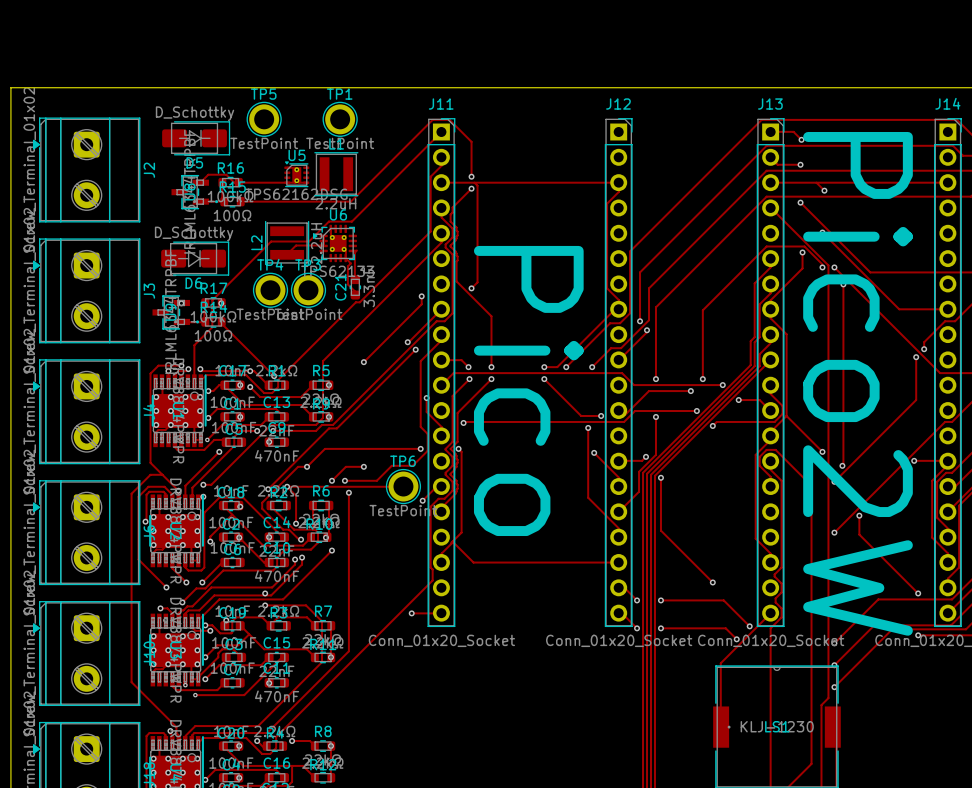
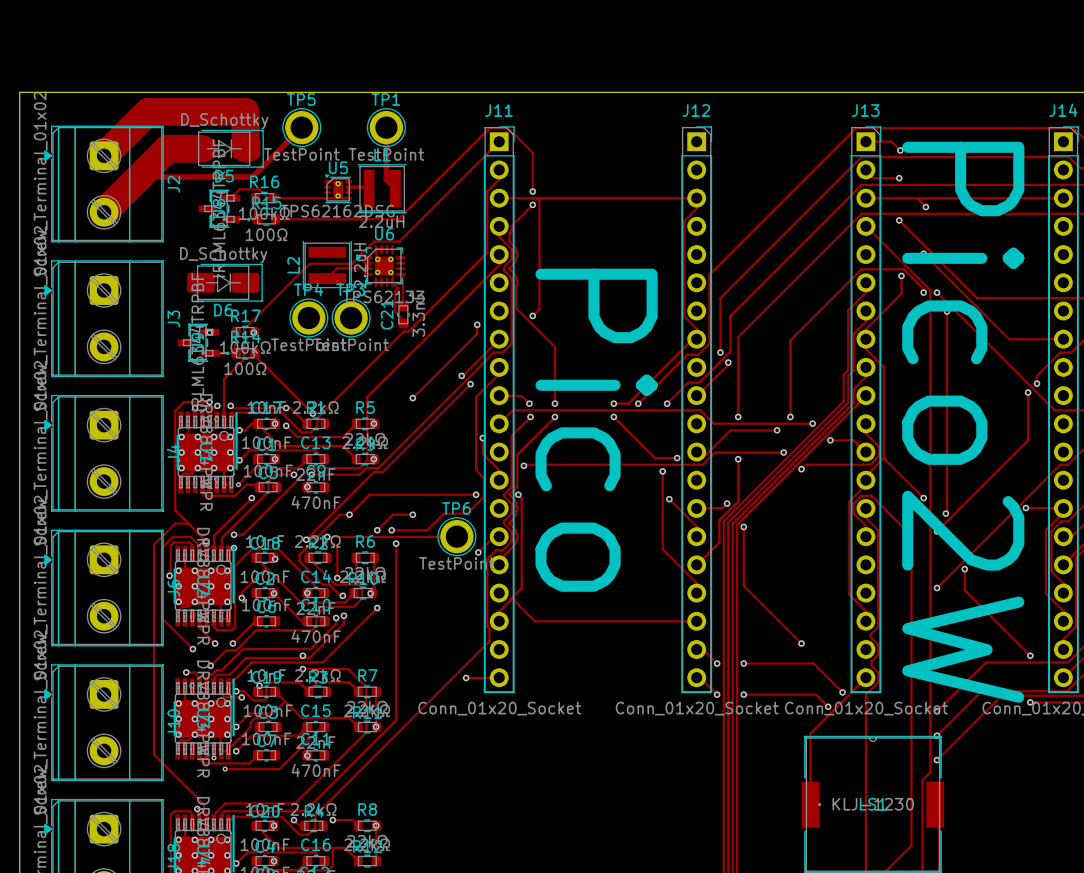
track: none -> (301, 127) (252, 176) (139, 176) (104, 212) (167, 148) (201, 148)
track: none -> (386, 127) (386, 179) (395, 188)
track: none -> (246, 148) (245, 111) (148, 111) (104, 155)
track: none -> (369, 188) (367, 187) (348, 187) (348, 192)

